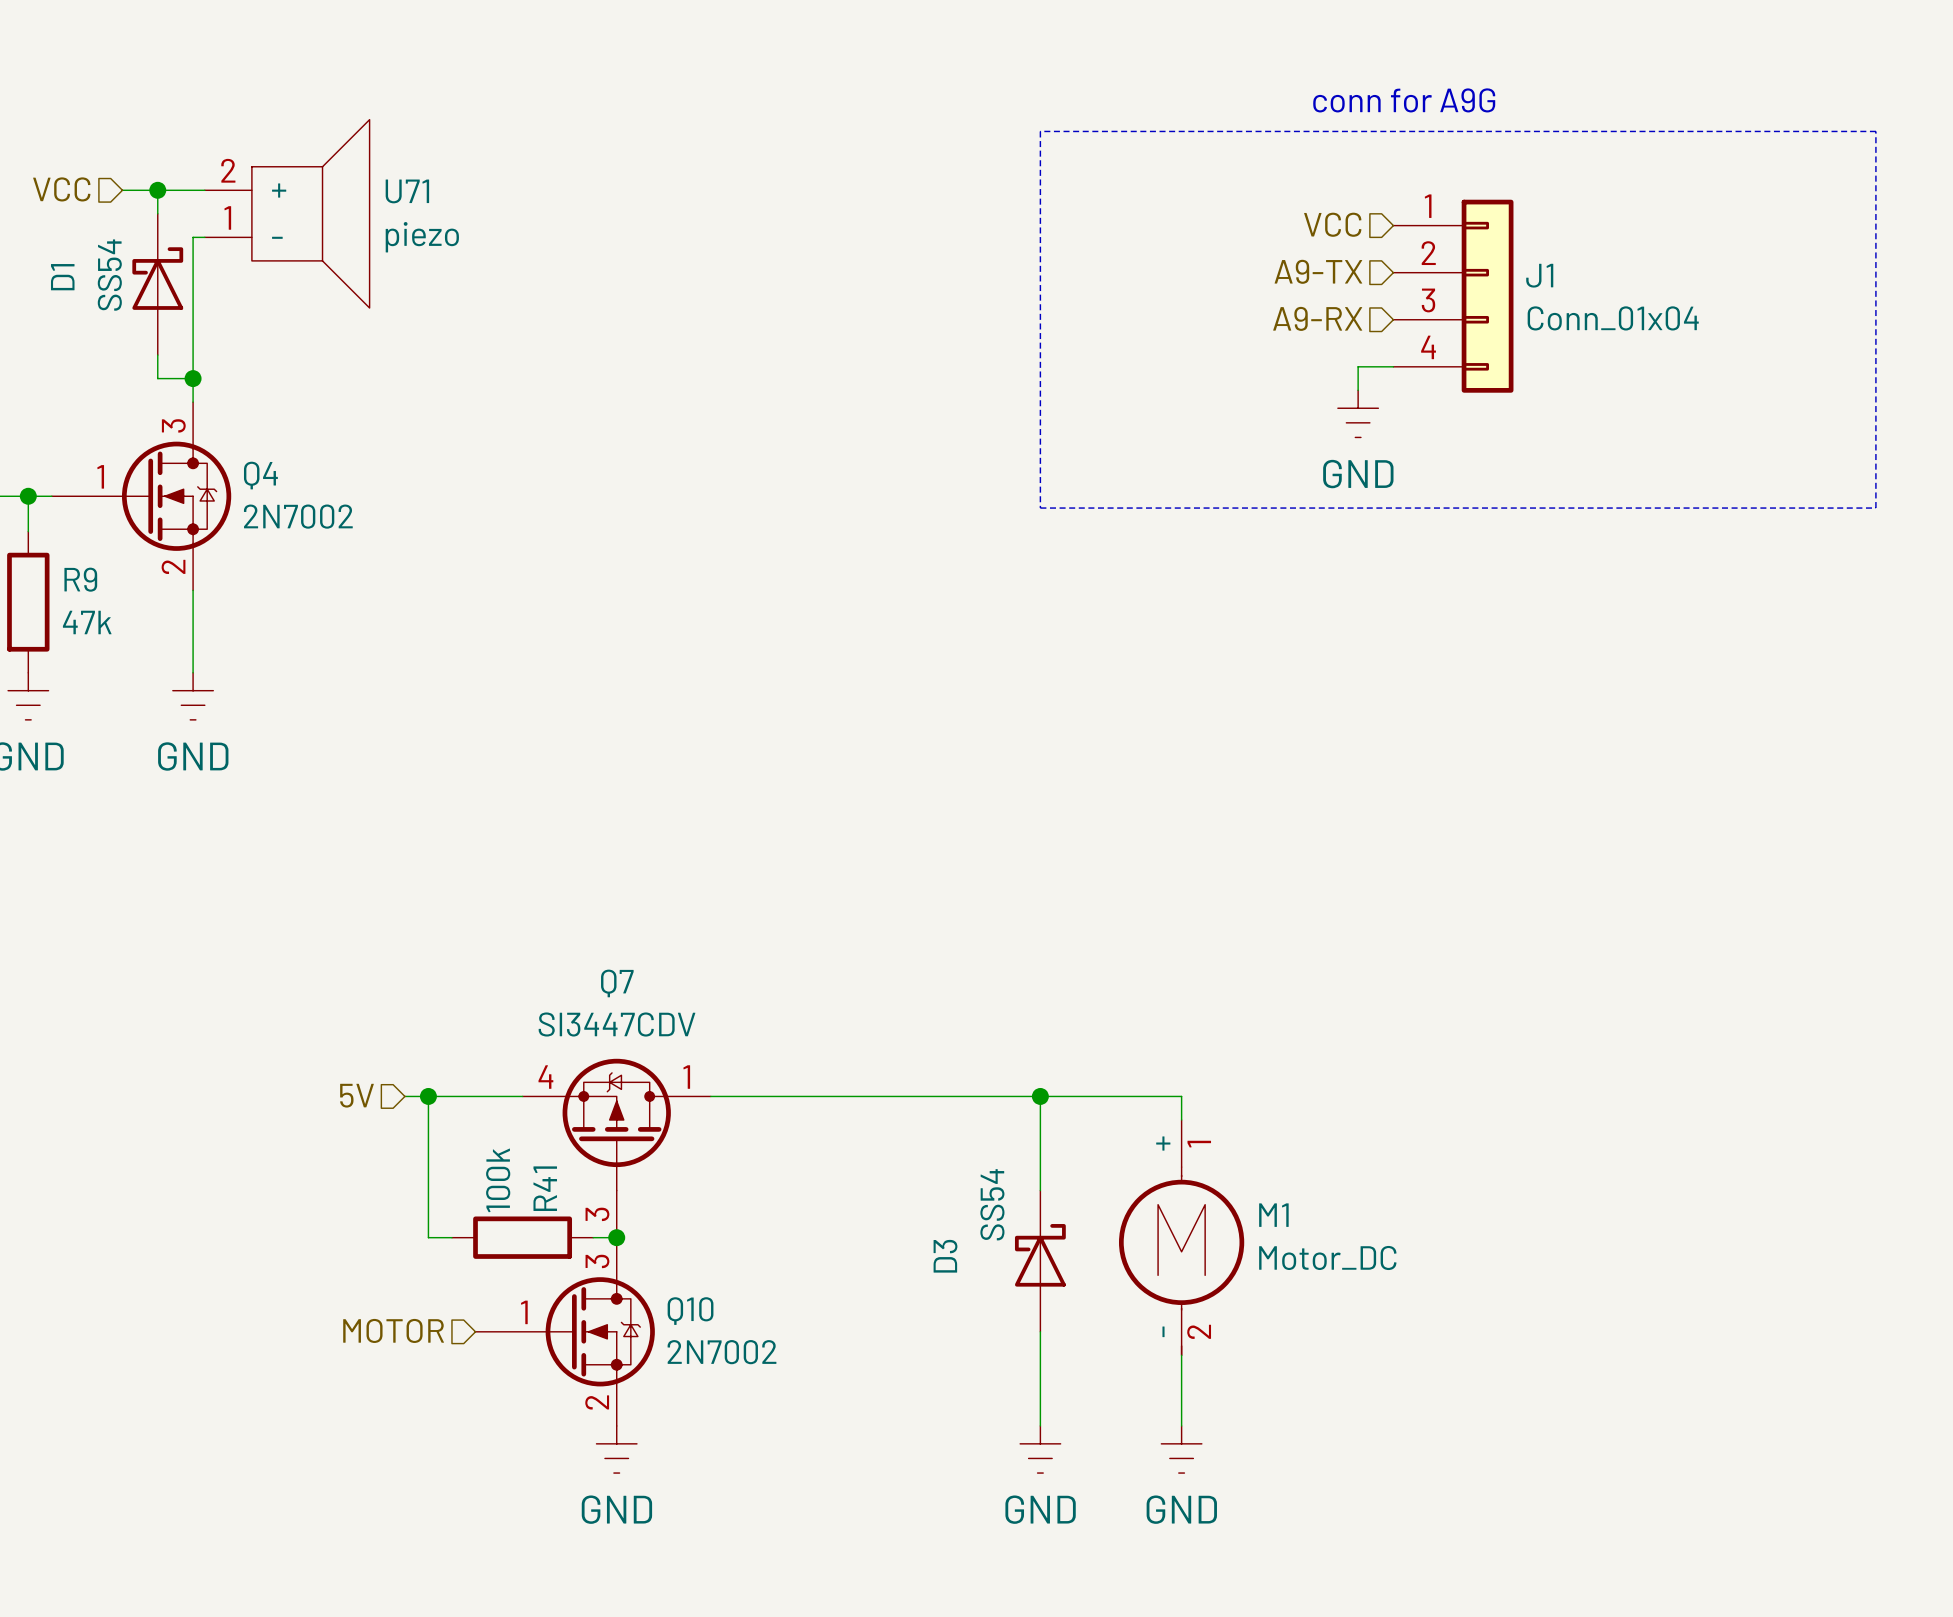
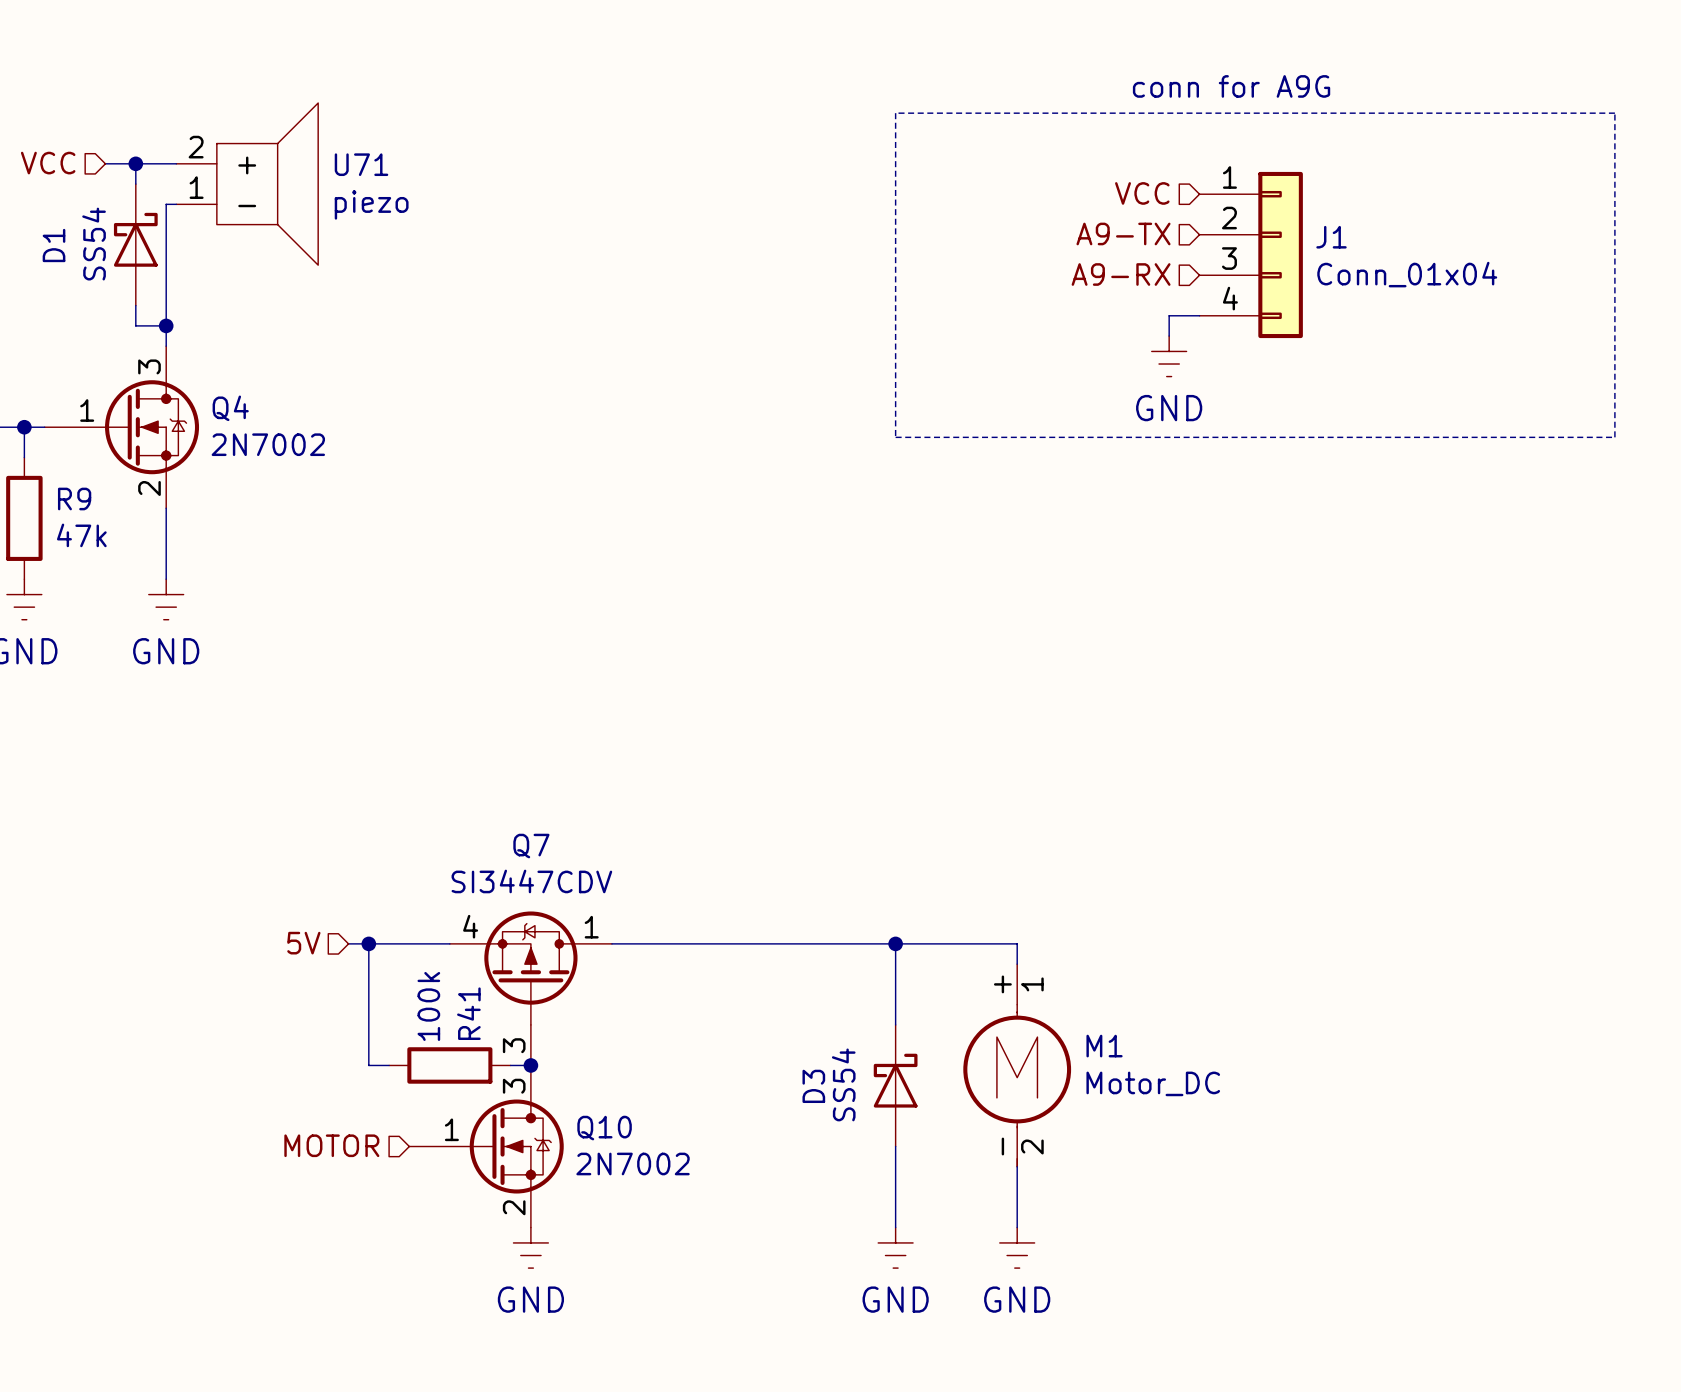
D3 value position: SS54 (992, 1204) -> SS54 (843, 1084)

